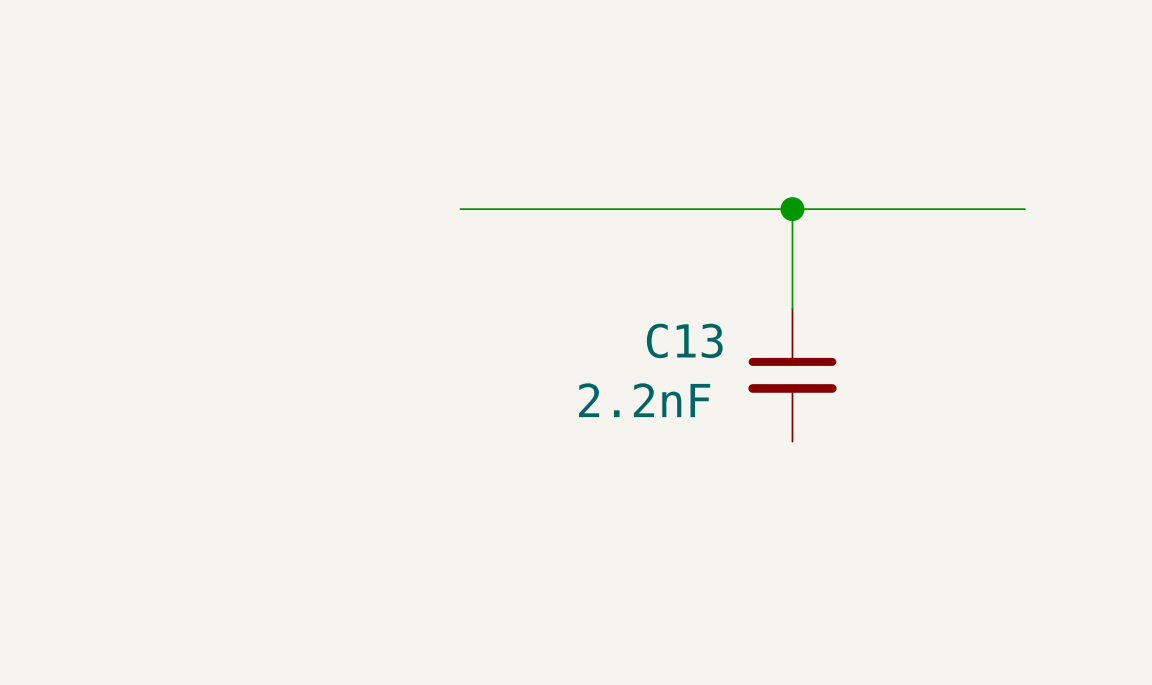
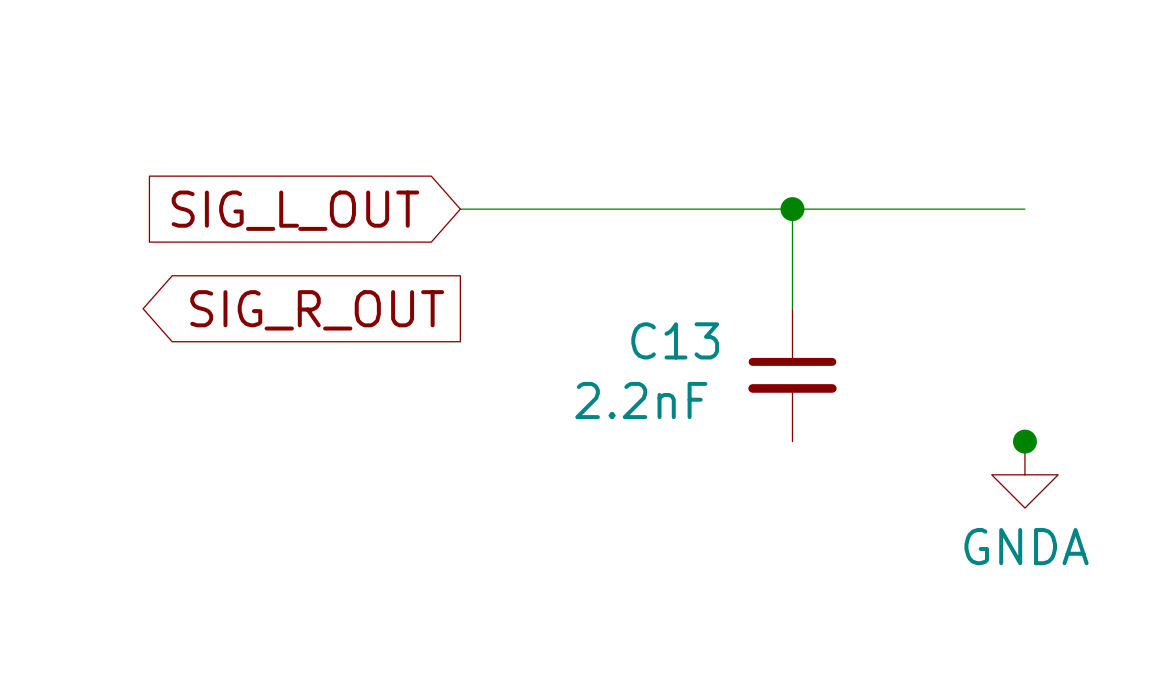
global label: none -> SIG_L_OUT (295, 210)
global label: none -> SIG_R_OUT (317, 310)
junction: none -> (1024, 441)
power symbol: none -> GNDA (1024, 474)

